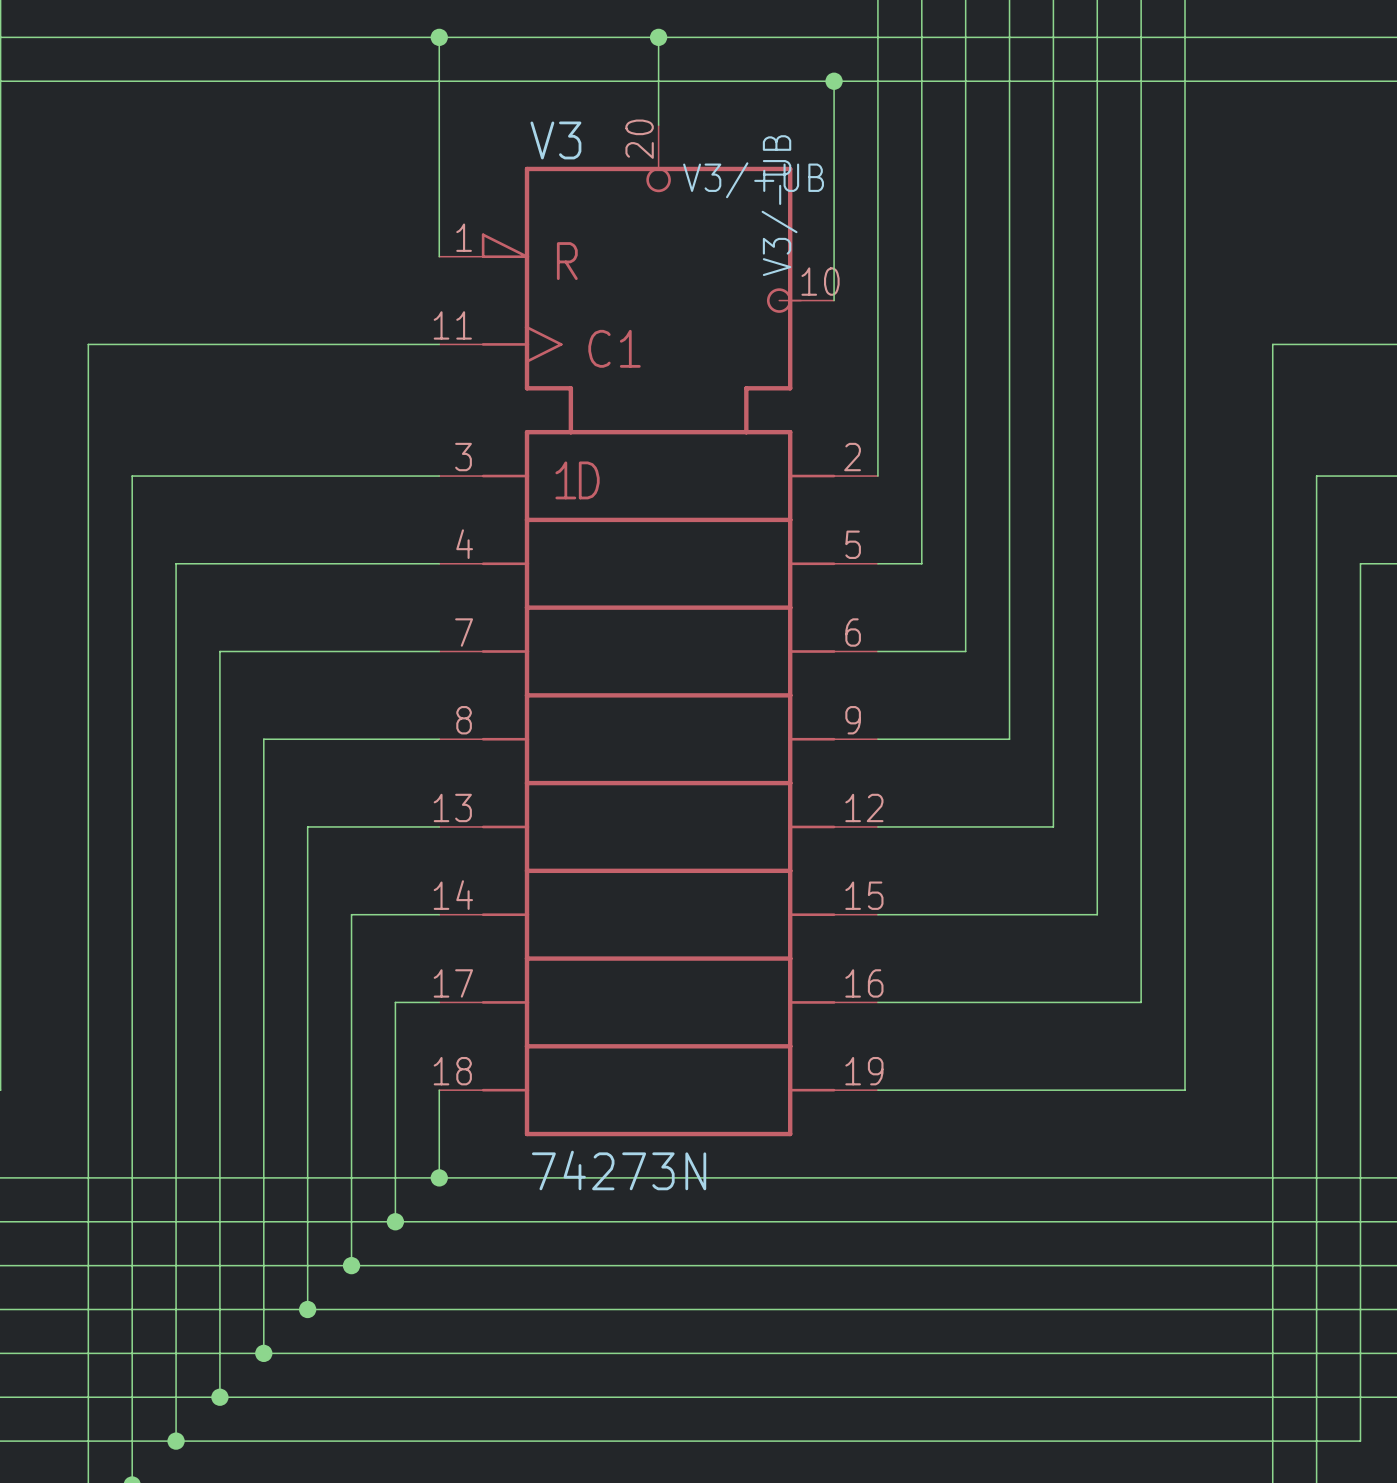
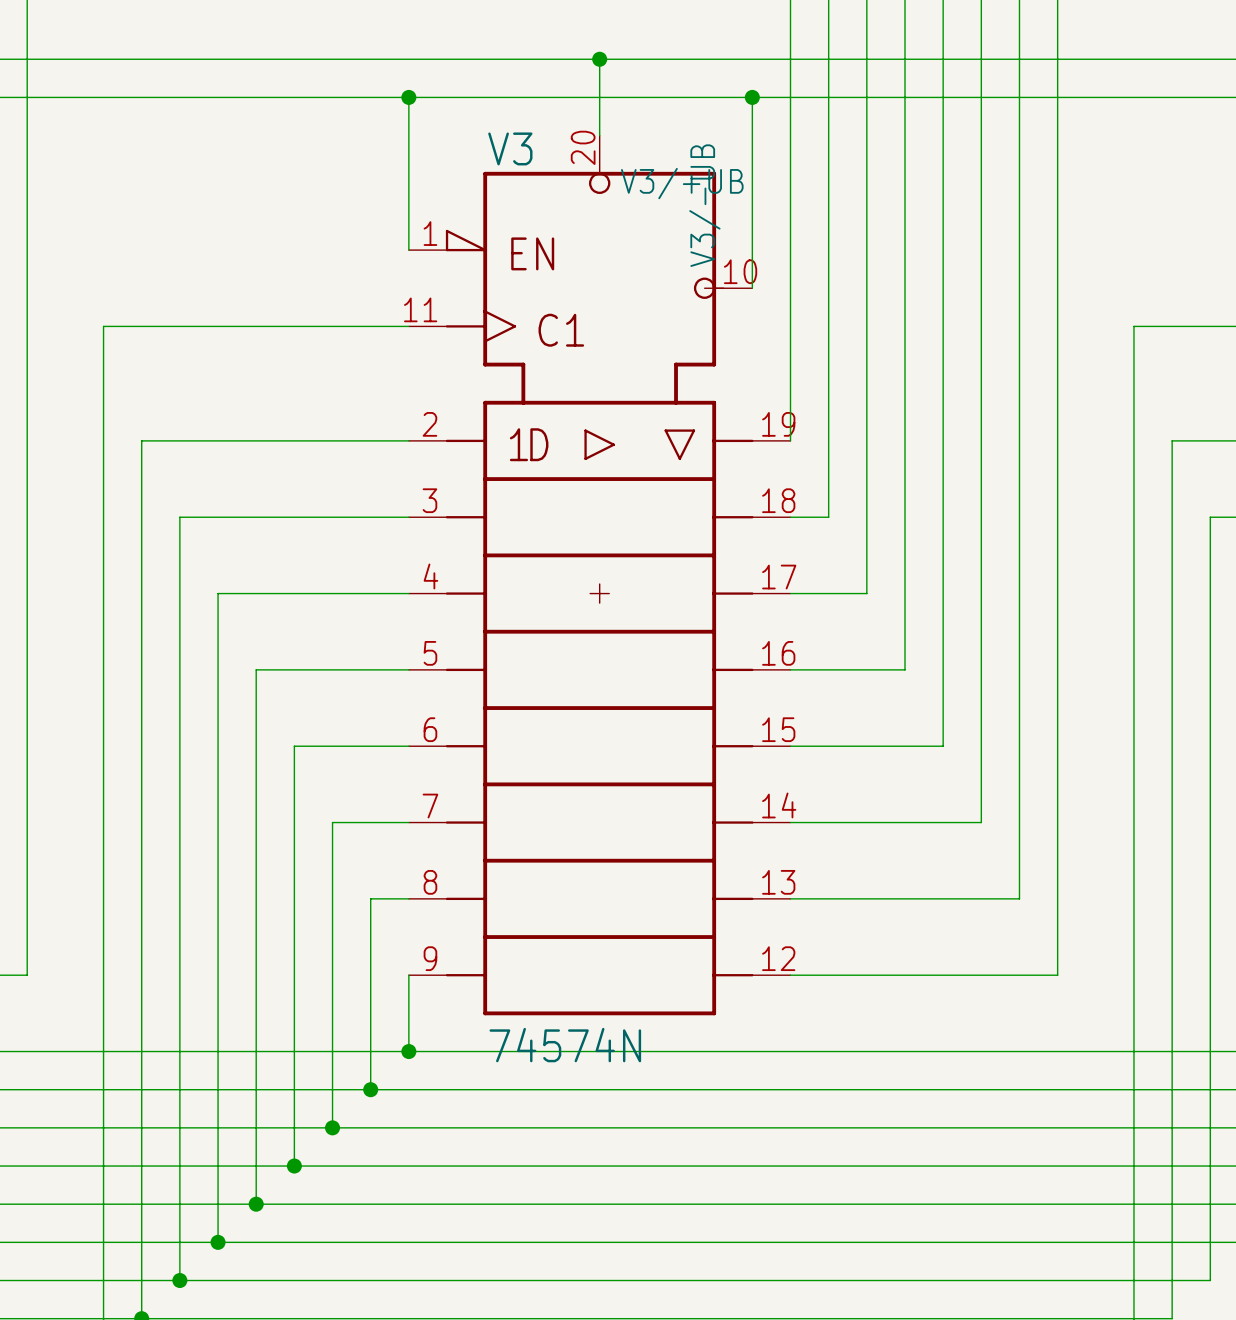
wire: (439, 37) (439, 81) -> none
junction position: (439, 37) -> (408, 97)
V3 symbol: [439, 166, 878, 1137] -> [408, 171, 791, 1016]
V3 value: 74273N (619, 1170) -> 74574N (565, 1045)

